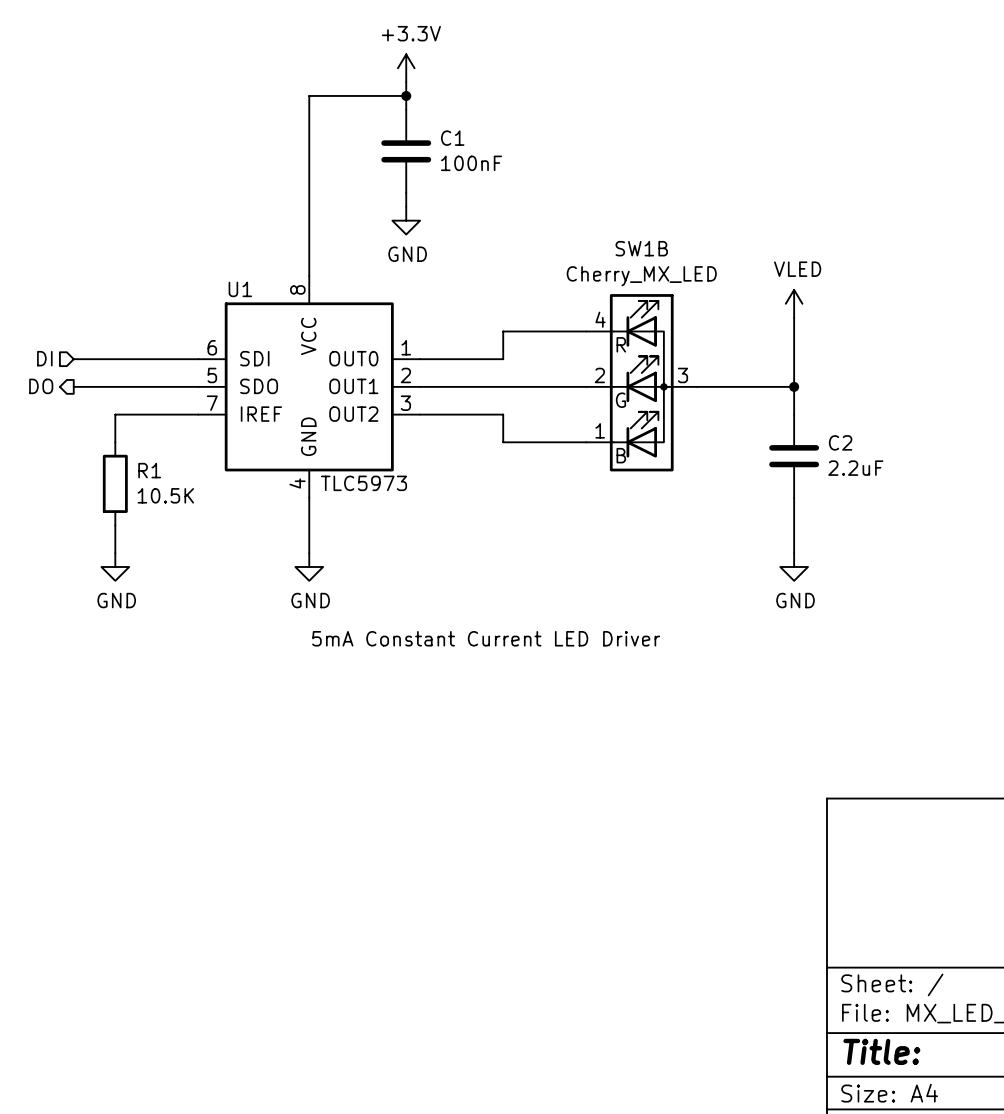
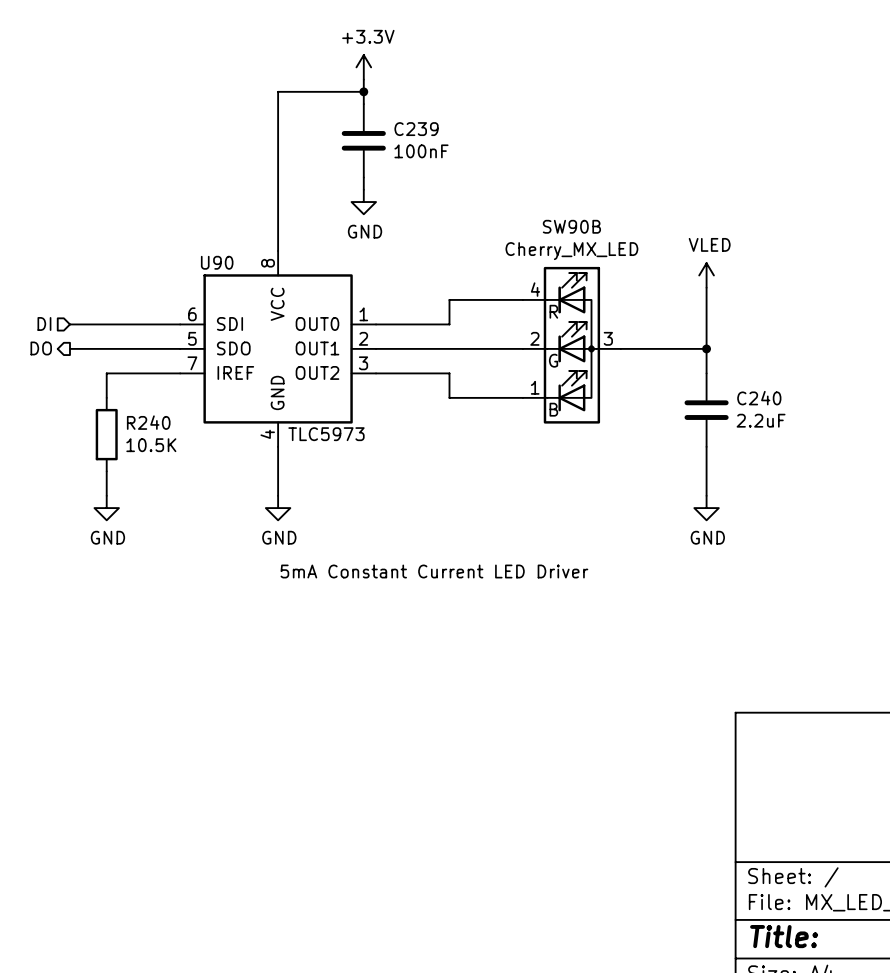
C1 name: C1 (452, 138) -> C239 (416, 129)
SW1B name: SW1B (641, 248) -> SW90B (571, 226)
U1 name: U1 (240, 289) -> U90 (217, 262)
C2 name: C2 (840, 442) -> C240 (759, 398)
R1 name: R1 (149, 470) -> R240 (148, 422)

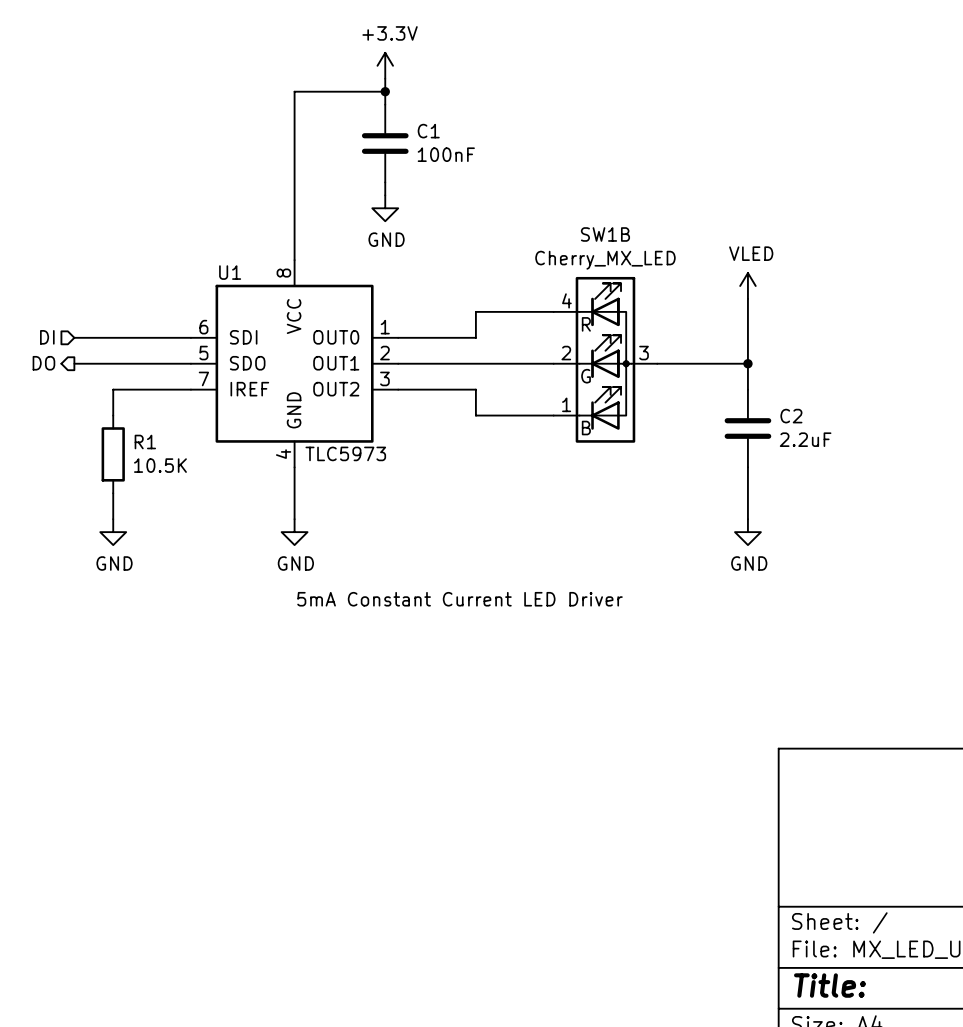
C239 name: C239 (416, 129) -> C1 (428, 131)
SW90B name: SW90B (571, 226) -> SW1B (605, 234)
U90 name: U90 (217, 262) -> U1 (230, 272)
C240 name: C240 (759, 398) -> C2 (791, 416)
R240 name: R240 (148, 422) -> R1 (145, 442)

